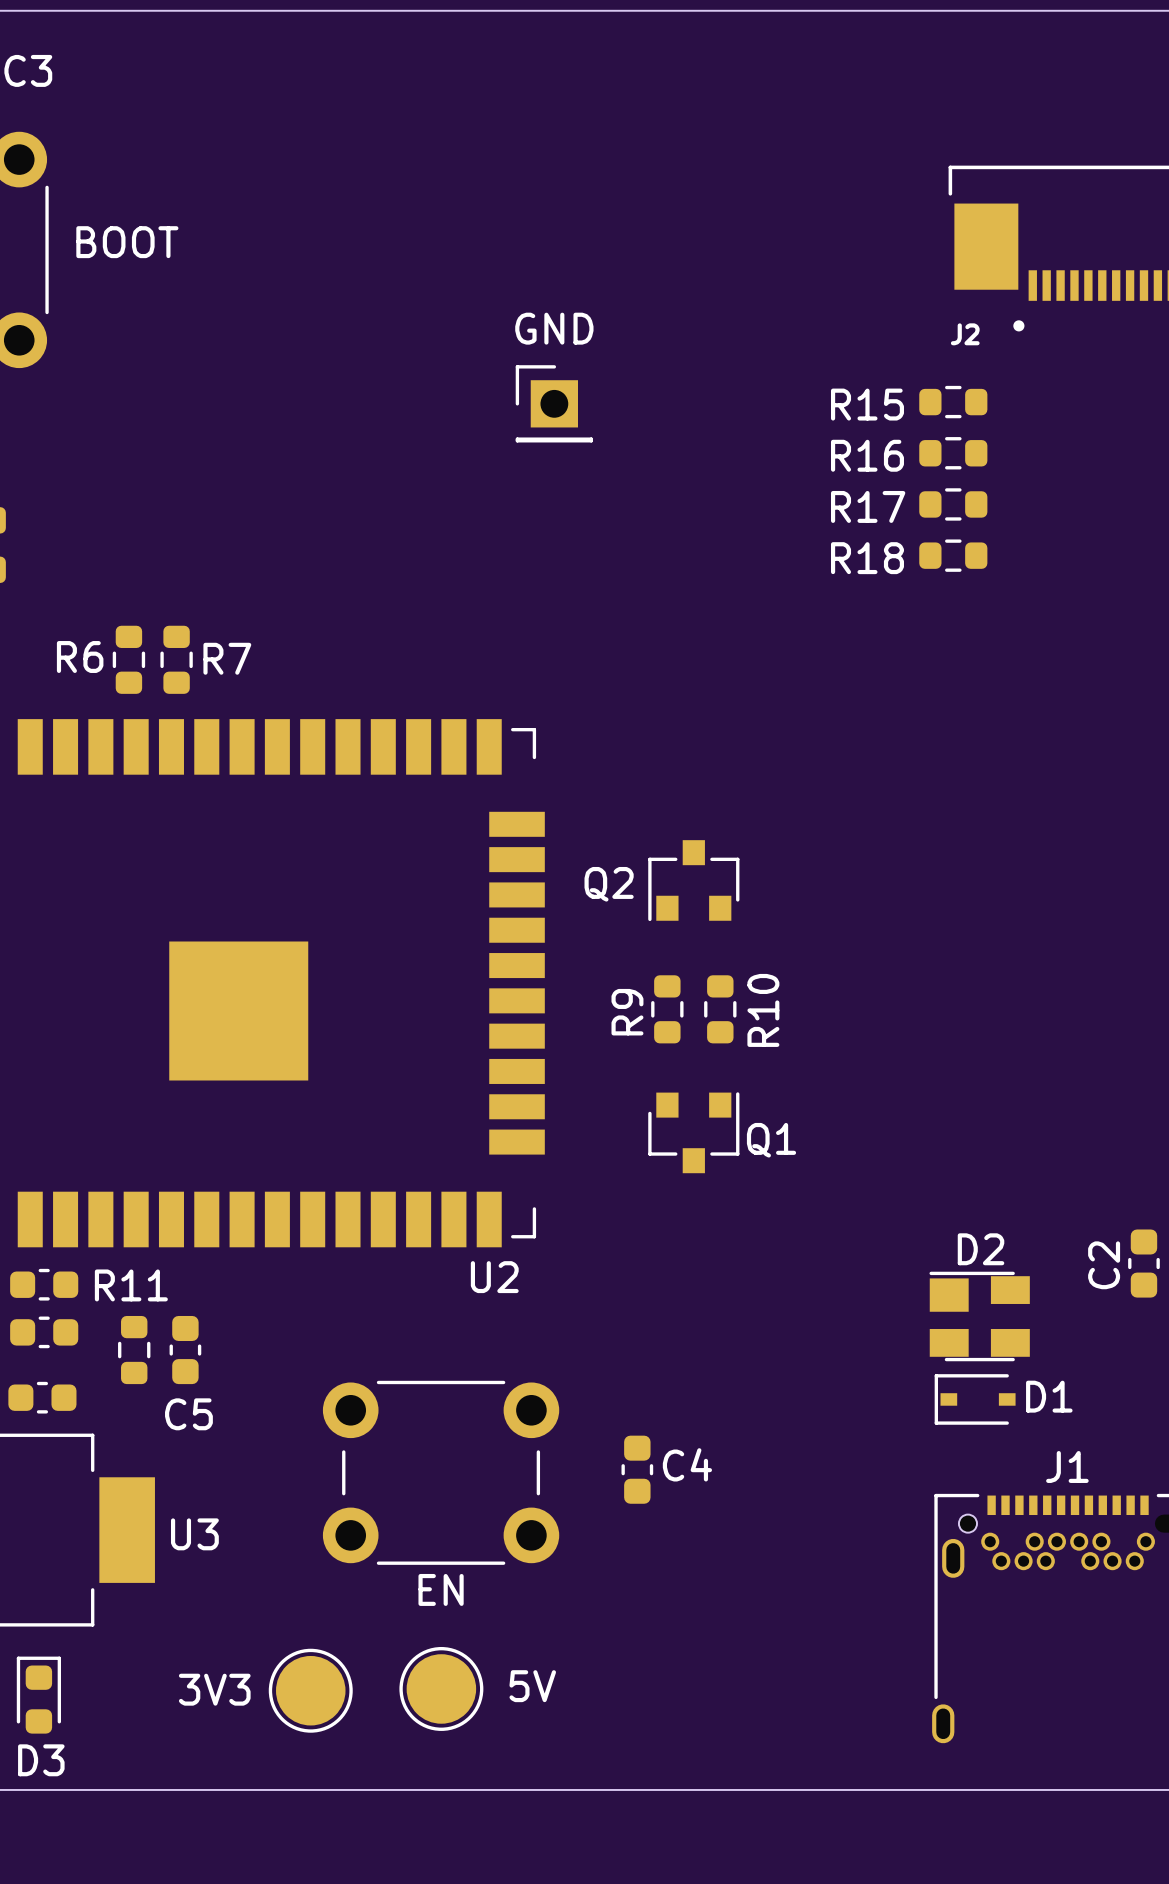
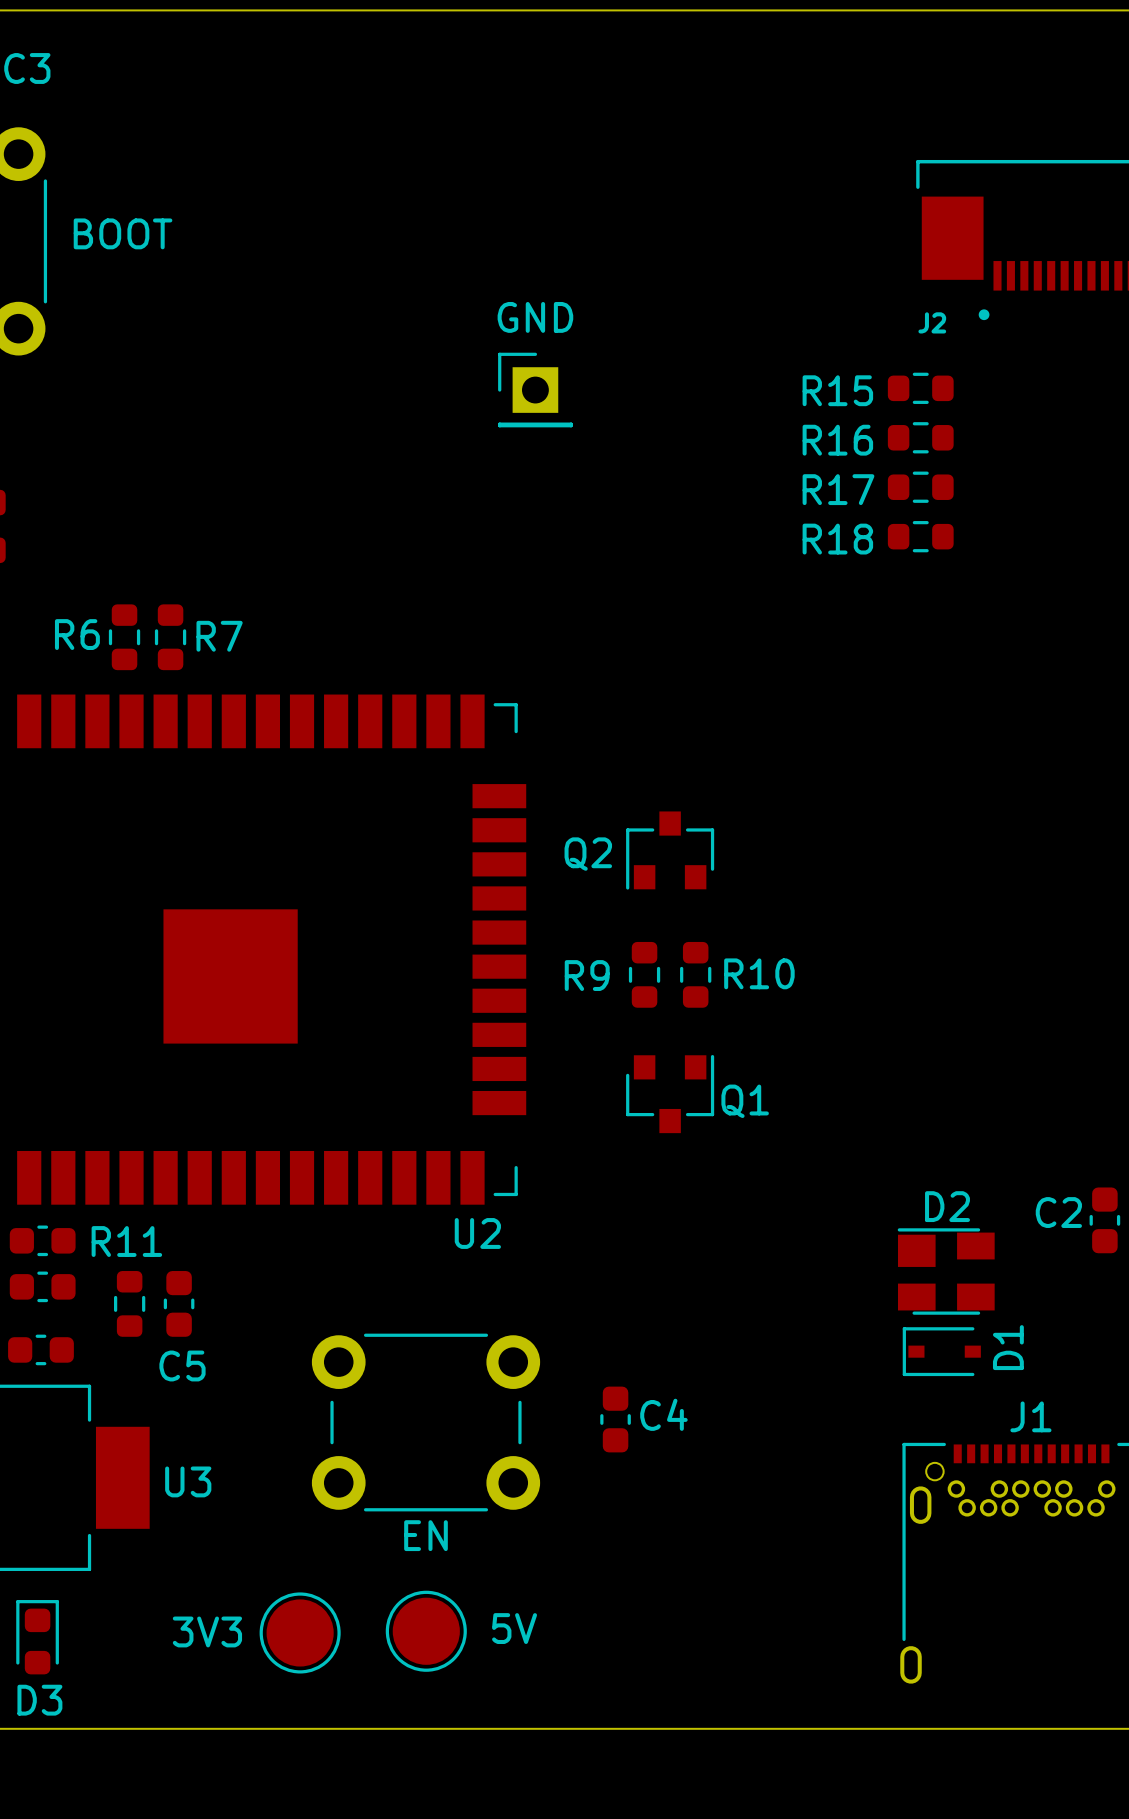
R10 name rotation: 0° (763, 1010) -> 90° clockwise (759, 973)
R9 name rotation: 0° (627, 1012) -> 90° clockwise (587, 975)
C2 name rotation: 0° (1104, 1265) -> 90° clockwise (1058, 1212)
D1 name rotation: 0° (1049, 1396) -> 90° counterclockwise (1008, 1347)

